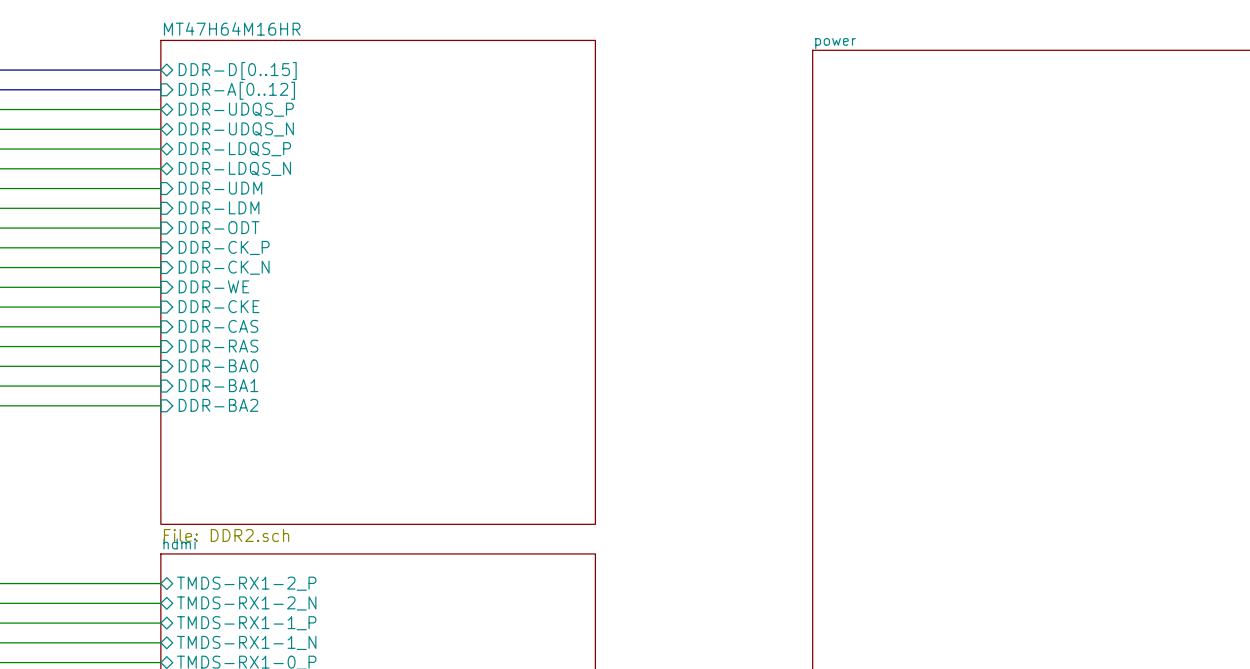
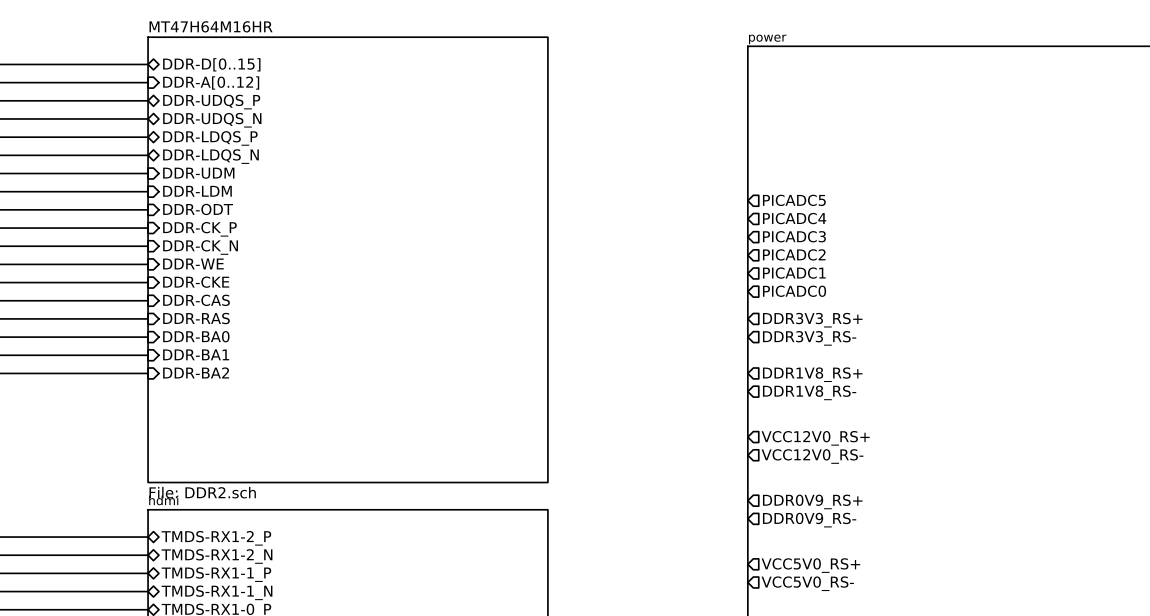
sheet pin: none -> PICADC5 (794, 200)
sheet pin: none -> PICADC4 (794, 218)
sheet pin: none -> PICADC3 (794, 236)
sheet pin: none -> PICADC2 (794, 254)
sheet pin: none -> PICADC1 (794, 273)
sheet pin: none -> PICADC0 (794, 291)
sheet pin: none -> DDR3V3_RS+ (812, 320)
sheet pin: none -> DDR3V3_RS- (809, 338)
sheet pin: none -> DDR1V8_RS+ (812, 374)
sheet pin: none -> DDR1V8_RS- (809, 392)
sheet pin: none -> VCC12V0_RS+ (815, 438)
sheet pin: none -> VCC12V0_RS- (812, 456)
sheet pin: none -> DDR0V9_RS+ (812, 501)
sheet pin: none -> DDR0V9_RS- (809, 520)
sheet pin: none -> VCC5V0_RS+ (810, 565)
sheet pin: none -> VCC5V0_RS- (807, 583)

